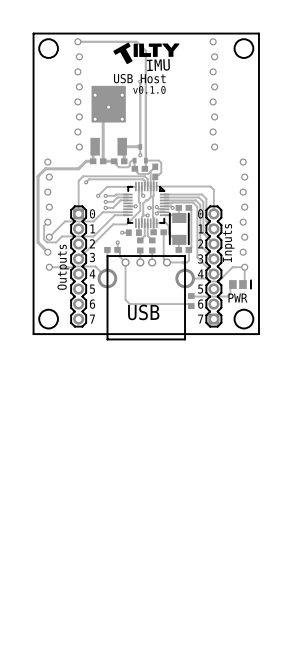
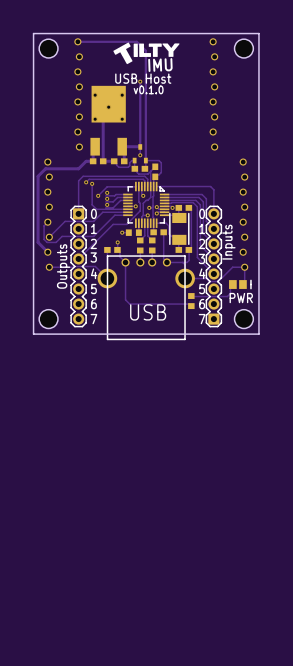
track: none -> (92, 183) (92, 204) (96, 209) (127, 209)
via: none -> (92, 183)
via: none -> (107, 192)
via: (105, 195) -> none
via: none -> (107, 198)
via: (105, 201) -> none
via: none -> (107, 204)
via: (105, 207) -> none

